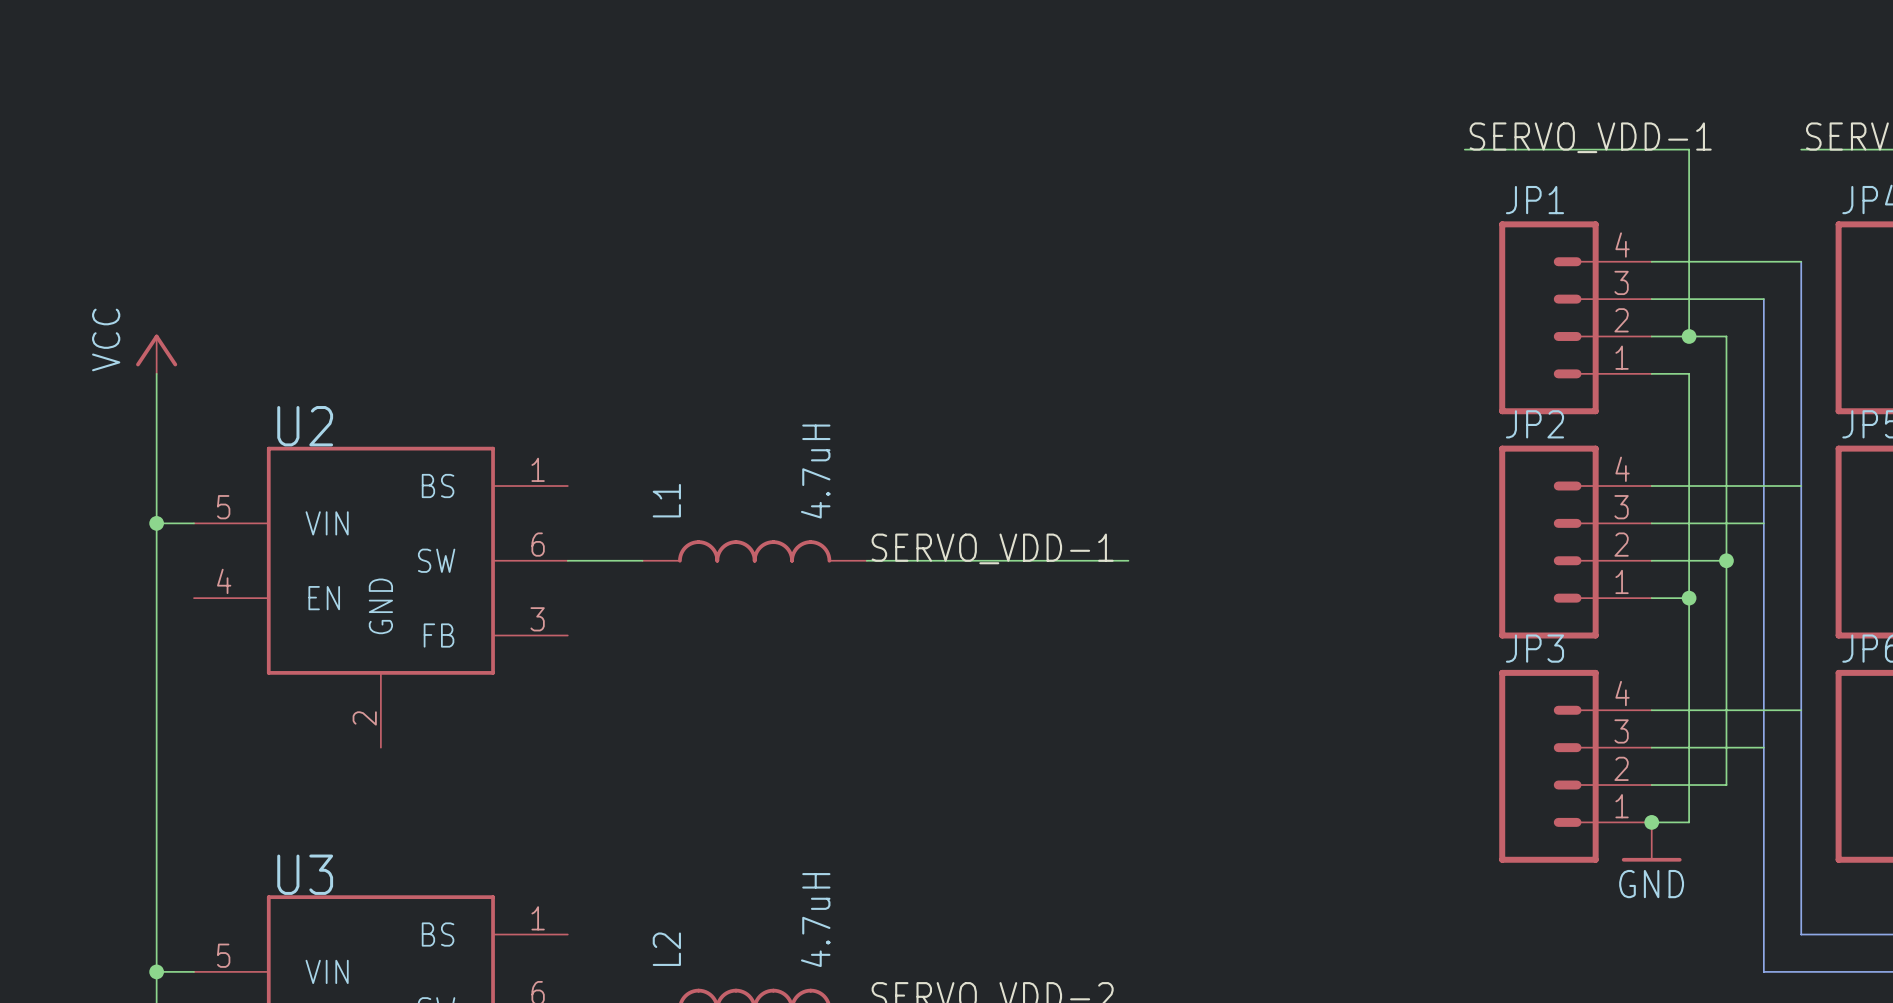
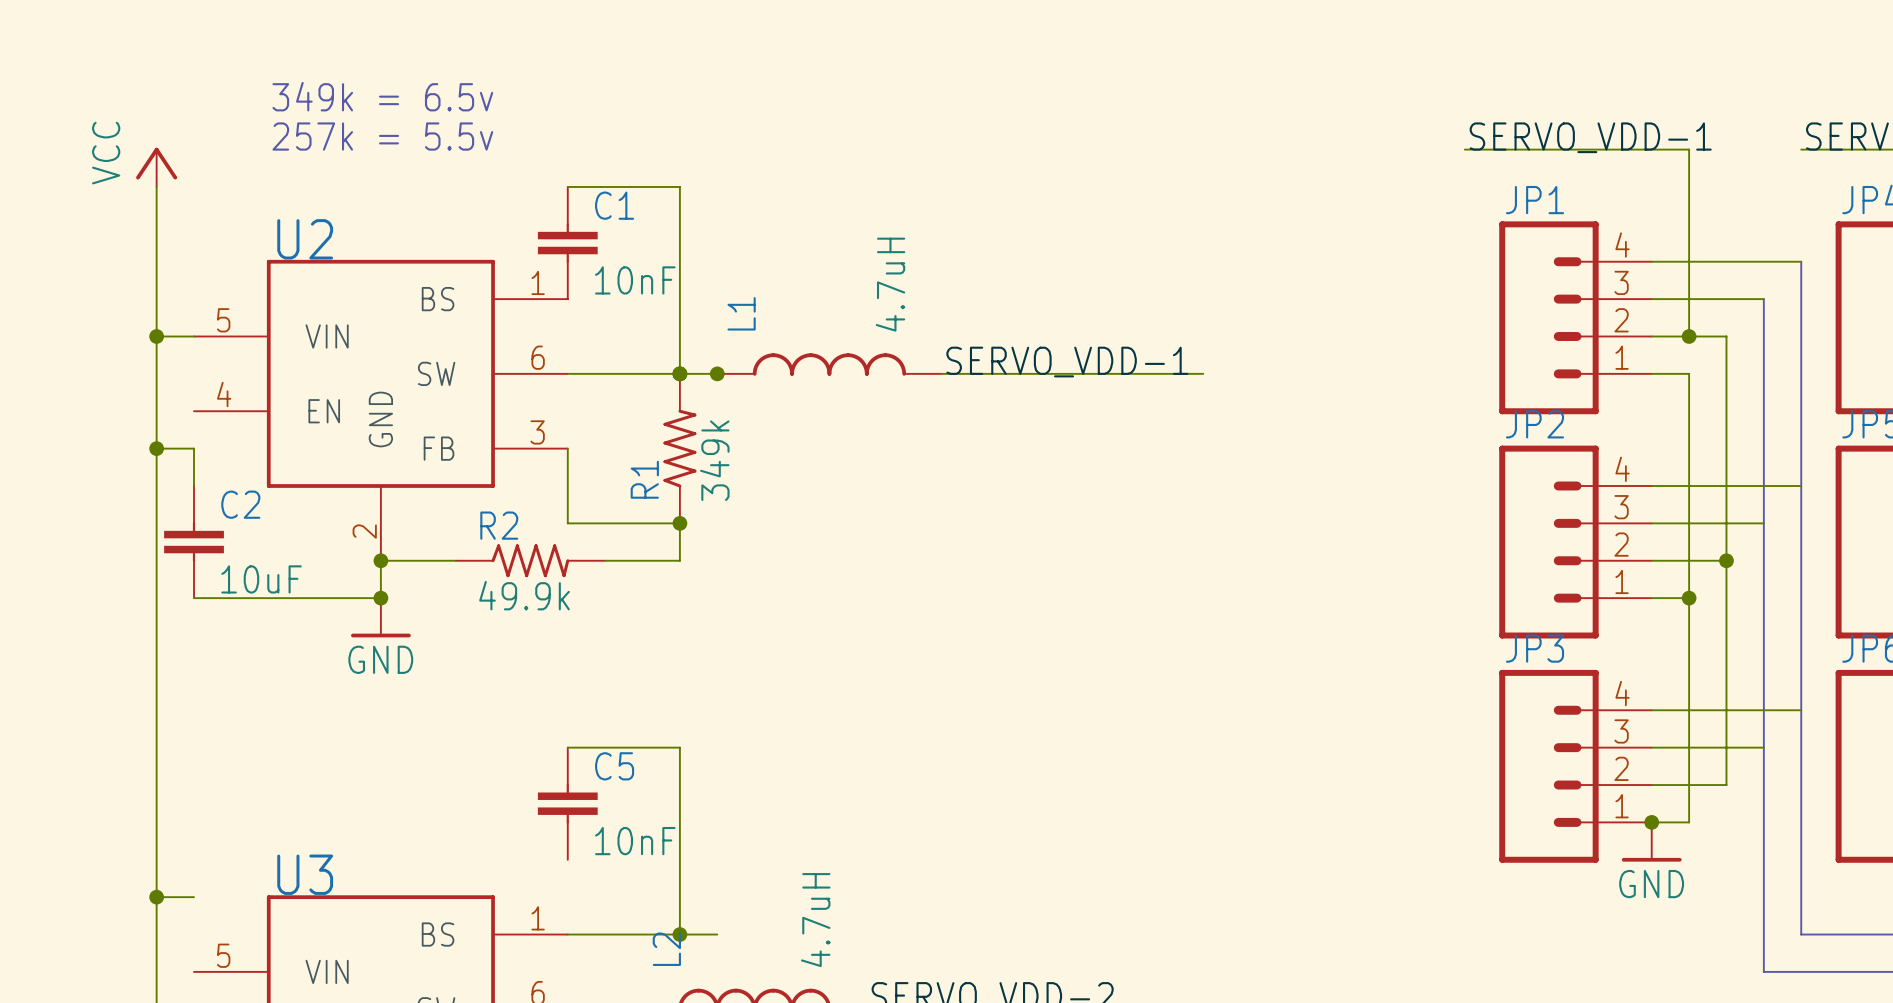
text: none -> 349k = 6.5v (382, 96)
text: none -> 257k = 5.5v (382, 136)
wire: none -> (156, 186) (156, 373)
wire: none -> (567, 186) (679, 186) (679, 373)
C1: none -> 10nF (567, 243)
junction: none -> (156, 336)
power symbol position: VCC (156, 354) -> VCC (156, 167)
wire: none -> (567, 373) (717, 373)
junction: none -> (679, 373)
junction: none -> (717, 373)
wire: none -> (156, 448) (194, 448) (194, 486)
wire: none -> (567, 448) (567, 523) (679, 523) (679, 560) (642, 560)
R1: none -> 349k (679, 448)
wire: (156, 523) (194, 523) -> (156, 336) (194, 336)
junction position: (156, 523) -> (156, 448)
junction: none -> (679, 523)
C2: none -> 10uF (194, 542)
label position: SERVO_VDD-1 (992, 548) -> SERVO_VDD-1 (1067, 362)
L1 position: (754, 551) -> (829, 364)
junction: none -> (380, 560)
wire: none -> (455, 560) (380, 560) (380, 598) (194, 598)
R2: none -> 49.9k (530, 560)
wire: (866, 560) (1128, 560) -> (941, 373) (1203, 373)
U2 position: (380, 597) -> (380, 410)
junction: none -> (380, 598)
power symbol: none -> GND (380, 617)
wire: none -> (567, 747) (679, 747) (679, 934)
C5: none -> 10nF (567, 803)
wire: none -> (567, 934) (717, 934)
junction: none -> (679, 934)
wire: (156, 971) (194, 971) -> (156, 897) (194, 897)
junction position: (156, 971) -> (156, 897)

